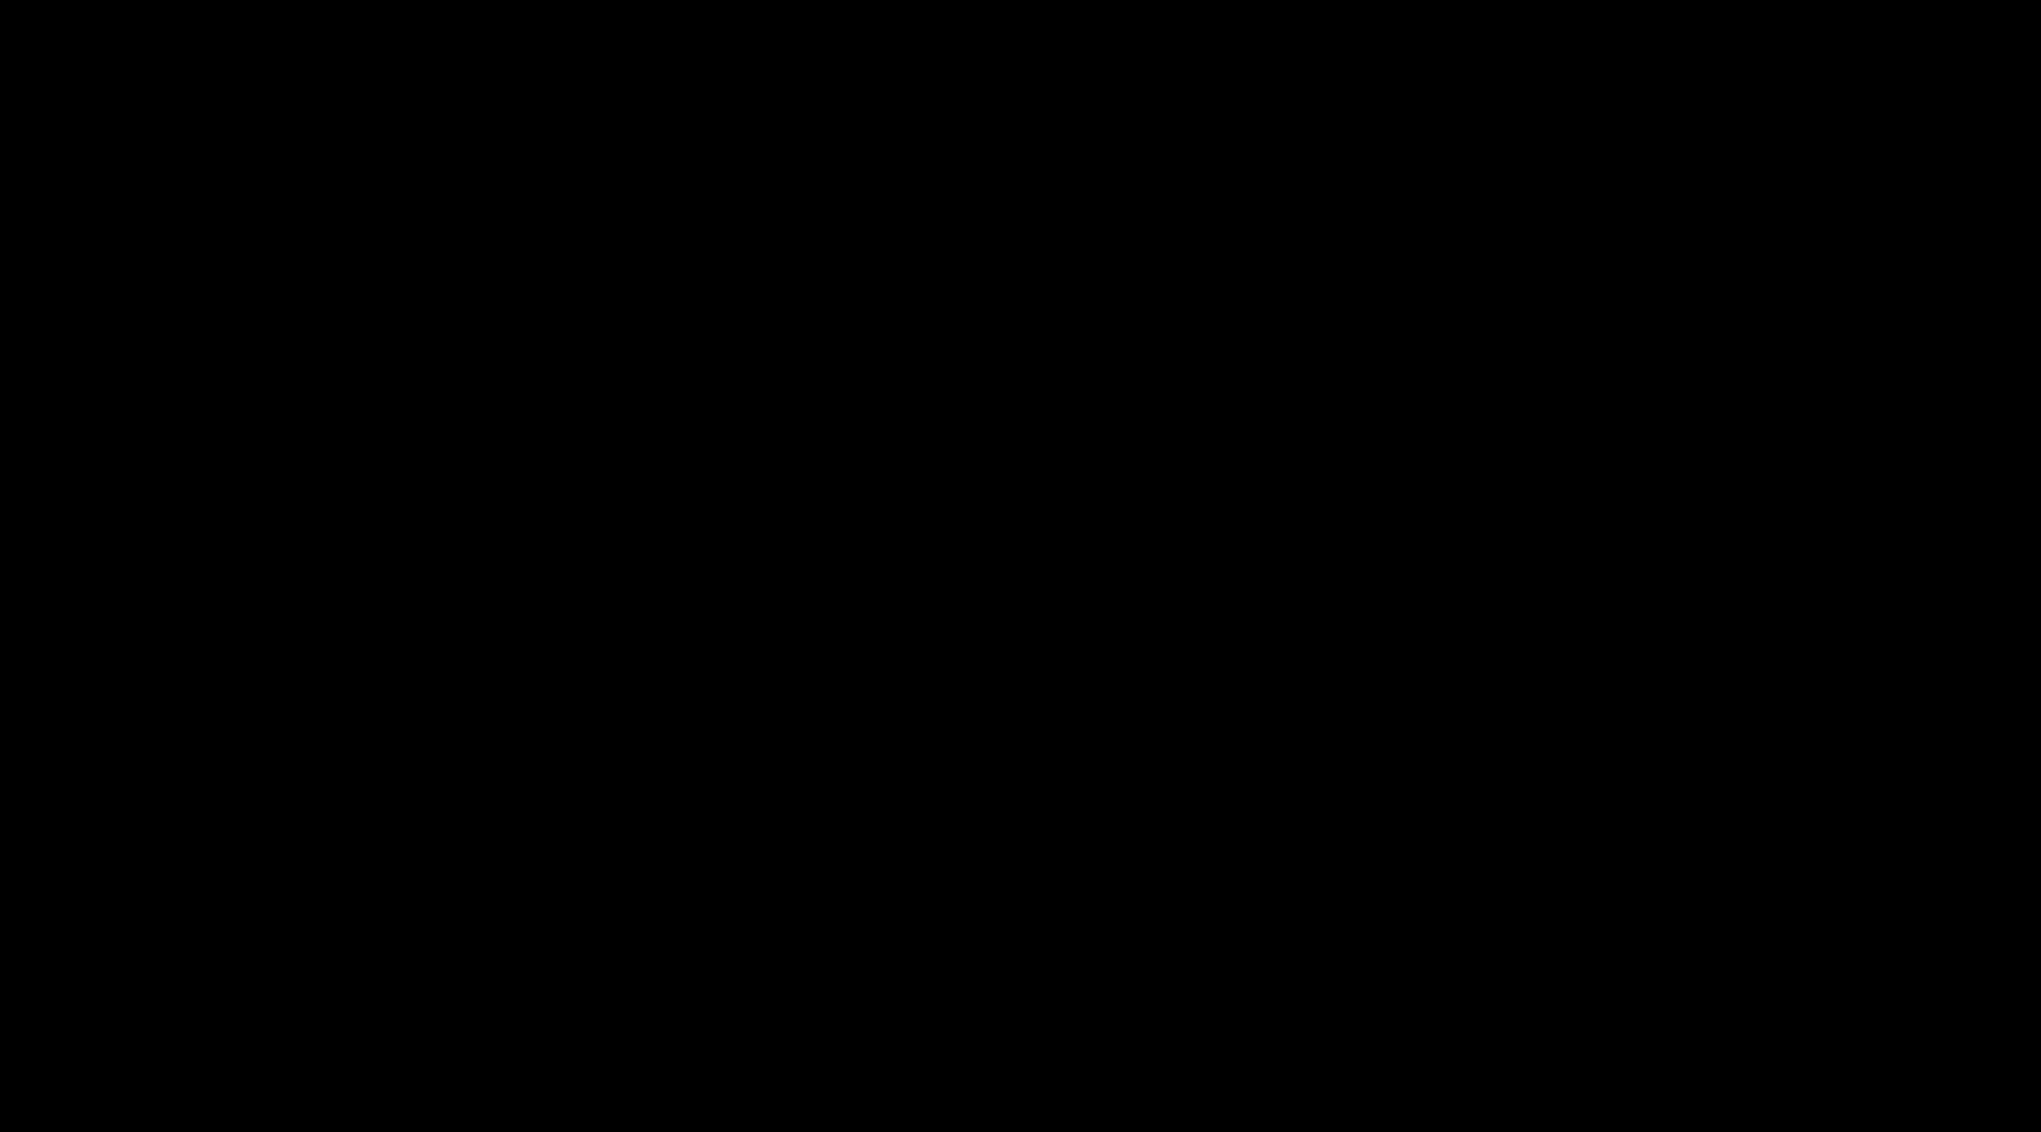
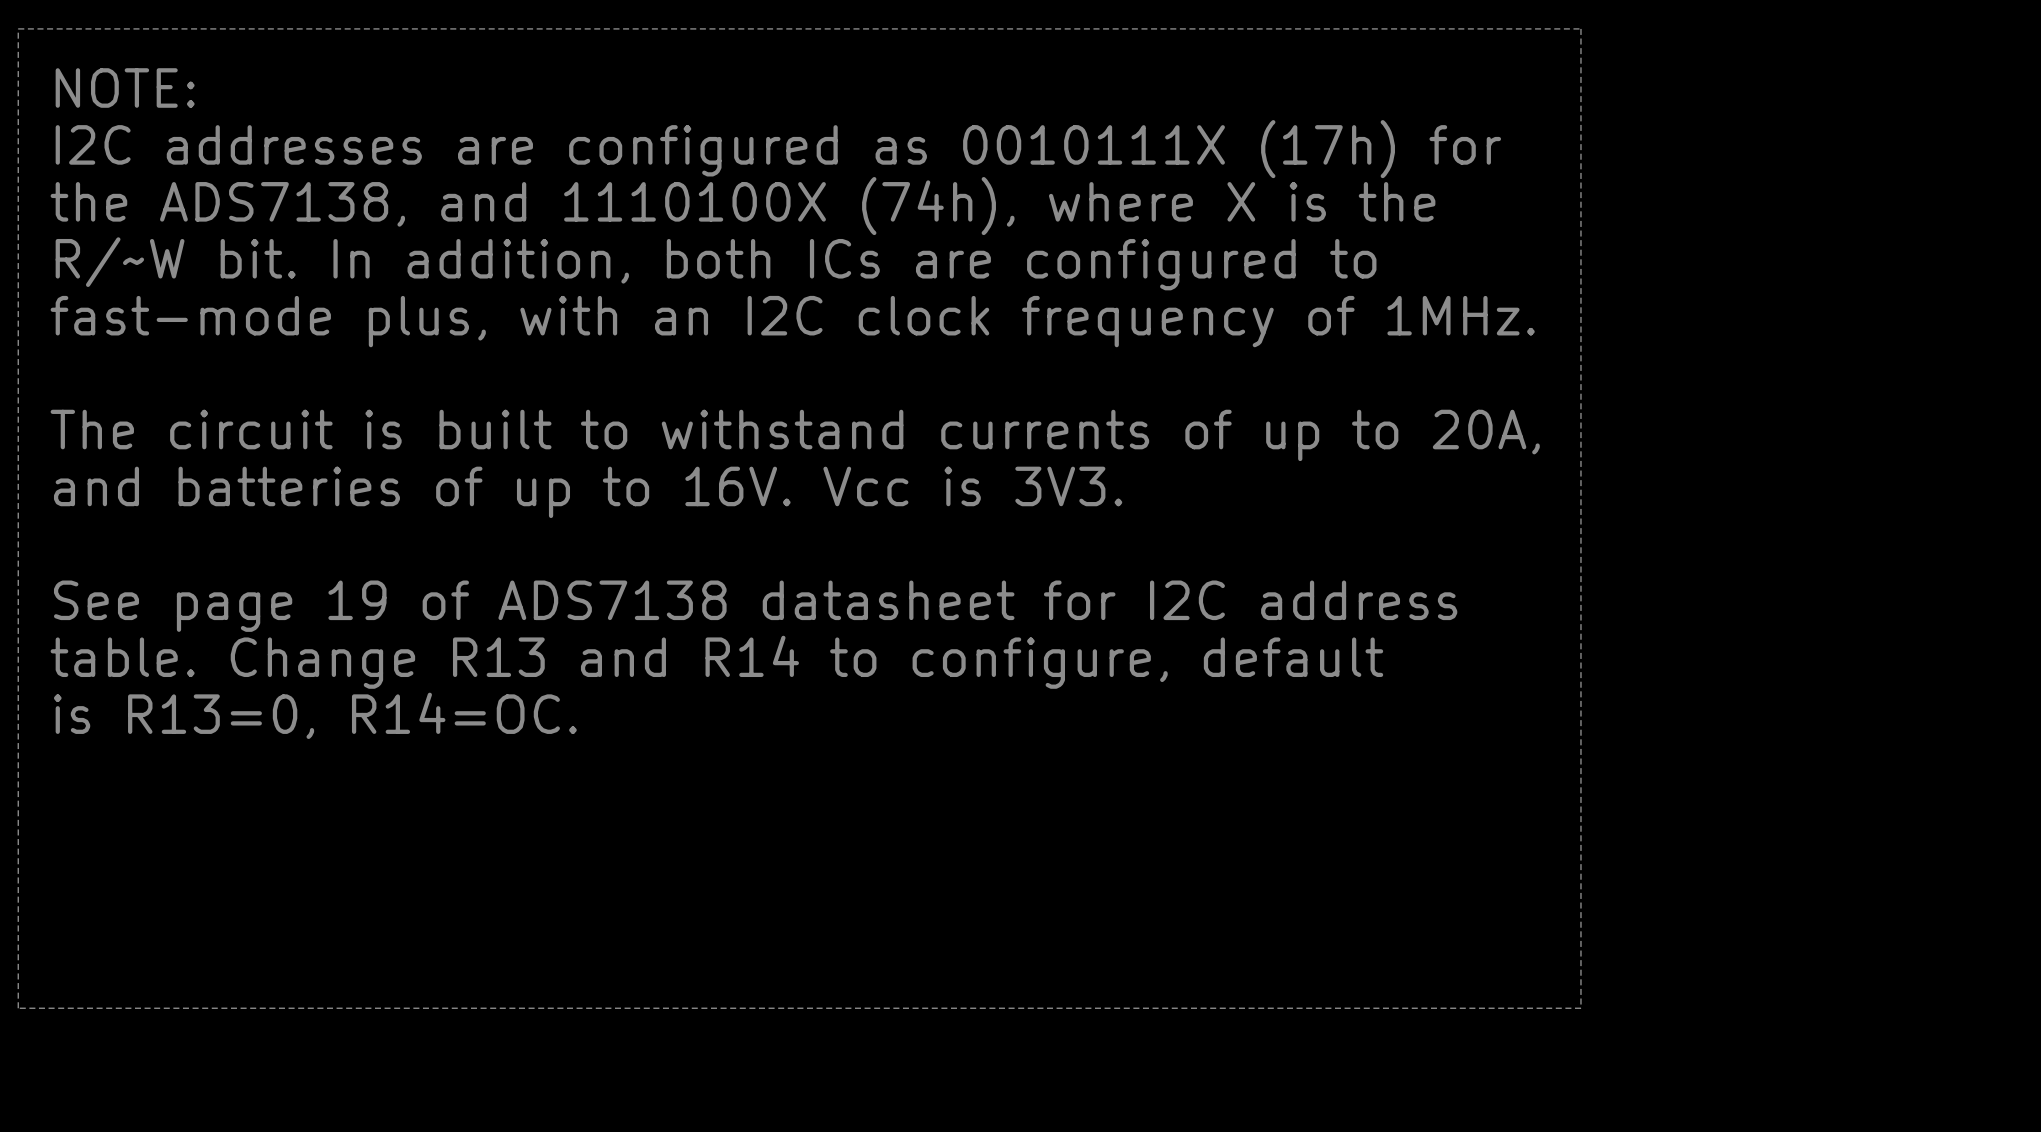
line: none -> (18, 28) (1580, 28) (1580, 1008) (18, 1008) (18, 28)
text: none -> NOTE: (125, 87)
text: none -> I2C addresses are configured as 0010111X (17h) for (778, 149)
text: none -> the ADS7138, and 1110100X (74h), where X is the (742, 206)
text: none -> R/~W bit. In addition, both ICs are configured to (716, 263)
text: none -> fast-mode plus, with an I2C clock frequency of 1MHz. (792, 321)
text: none -> The circuit is built to withstand currents of up to 20A, (795, 435)
text: none -> and batteries of up to 16V. Vcc is 3V3. (588, 492)
text: none -> See page 19 of ADS7138 datasheet for I2C address (755, 606)
text: none -> table. Change R13 and R14 to configure, default (716, 662)
text: none -> is R13=0, R14=OC. (315, 715)

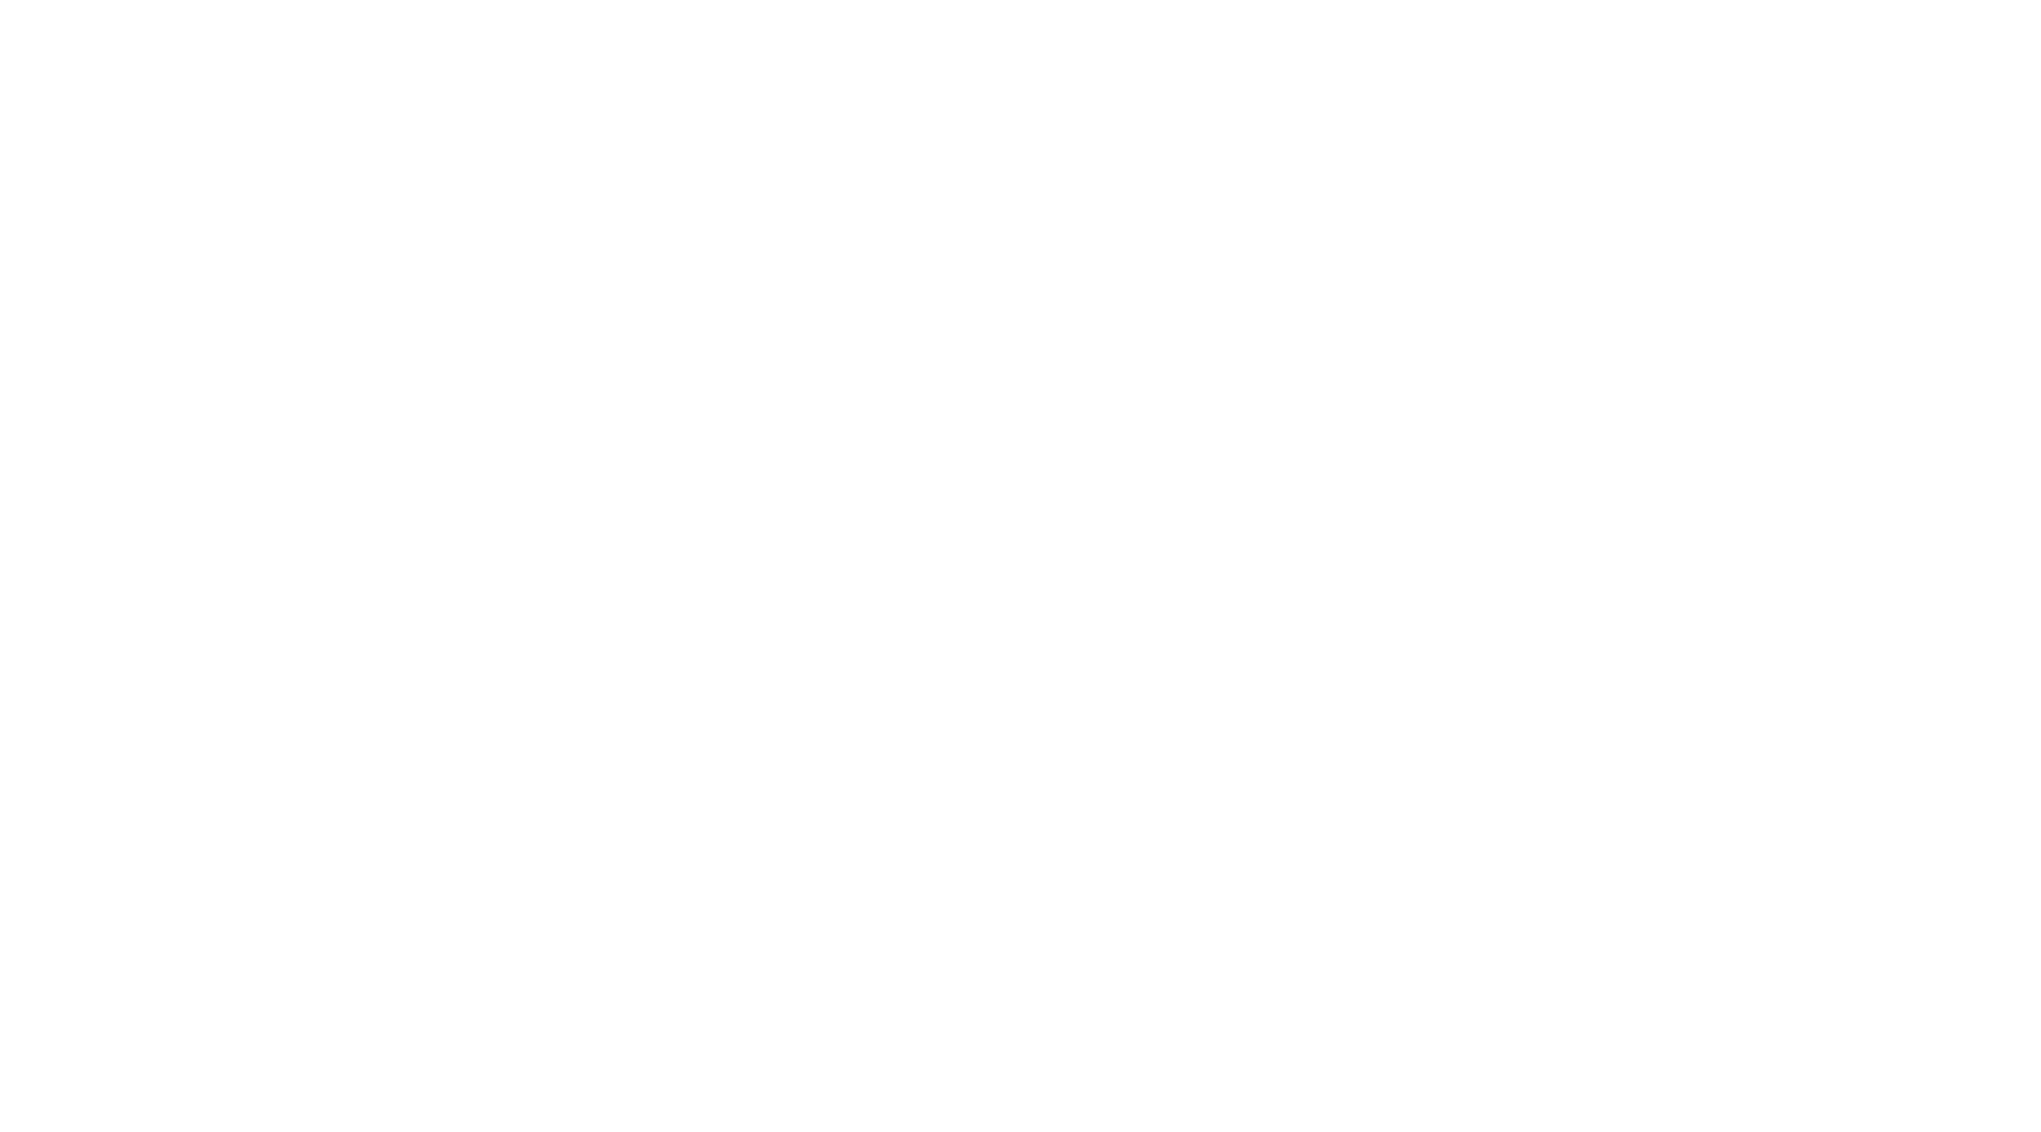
line: (18, 28) (1580, 28) (1580, 1008) (18, 1008) (18, 28) -> none
text: NOTE: (125, 87) -> none
text: I2C addresses are configured as 0010111X (17h) for (778, 149) -> none
text: the ADS7138, and 1110100X (74h), where X is the (742, 206) -> none
text: R/~W bit. In addition, both ICs are configured to (716, 263) -> none
text: fast-mode plus, with an I2C clock frequency of 1MHz. (792, 321) -> none
text: The circuit is built to withstand currents of up to 20A, (795, 435) -> none
text: and batteries of up to 16V. Vcc is 3V3. (588, 492) -> none
text: See page 19 of ADS7138 datasheet for I2C address (755, 606) -> none
text: table. Change R13 and R14 to configure, default (716, 662) -> none
text: is R13=0, R14=OC. (315, 715) -> none

